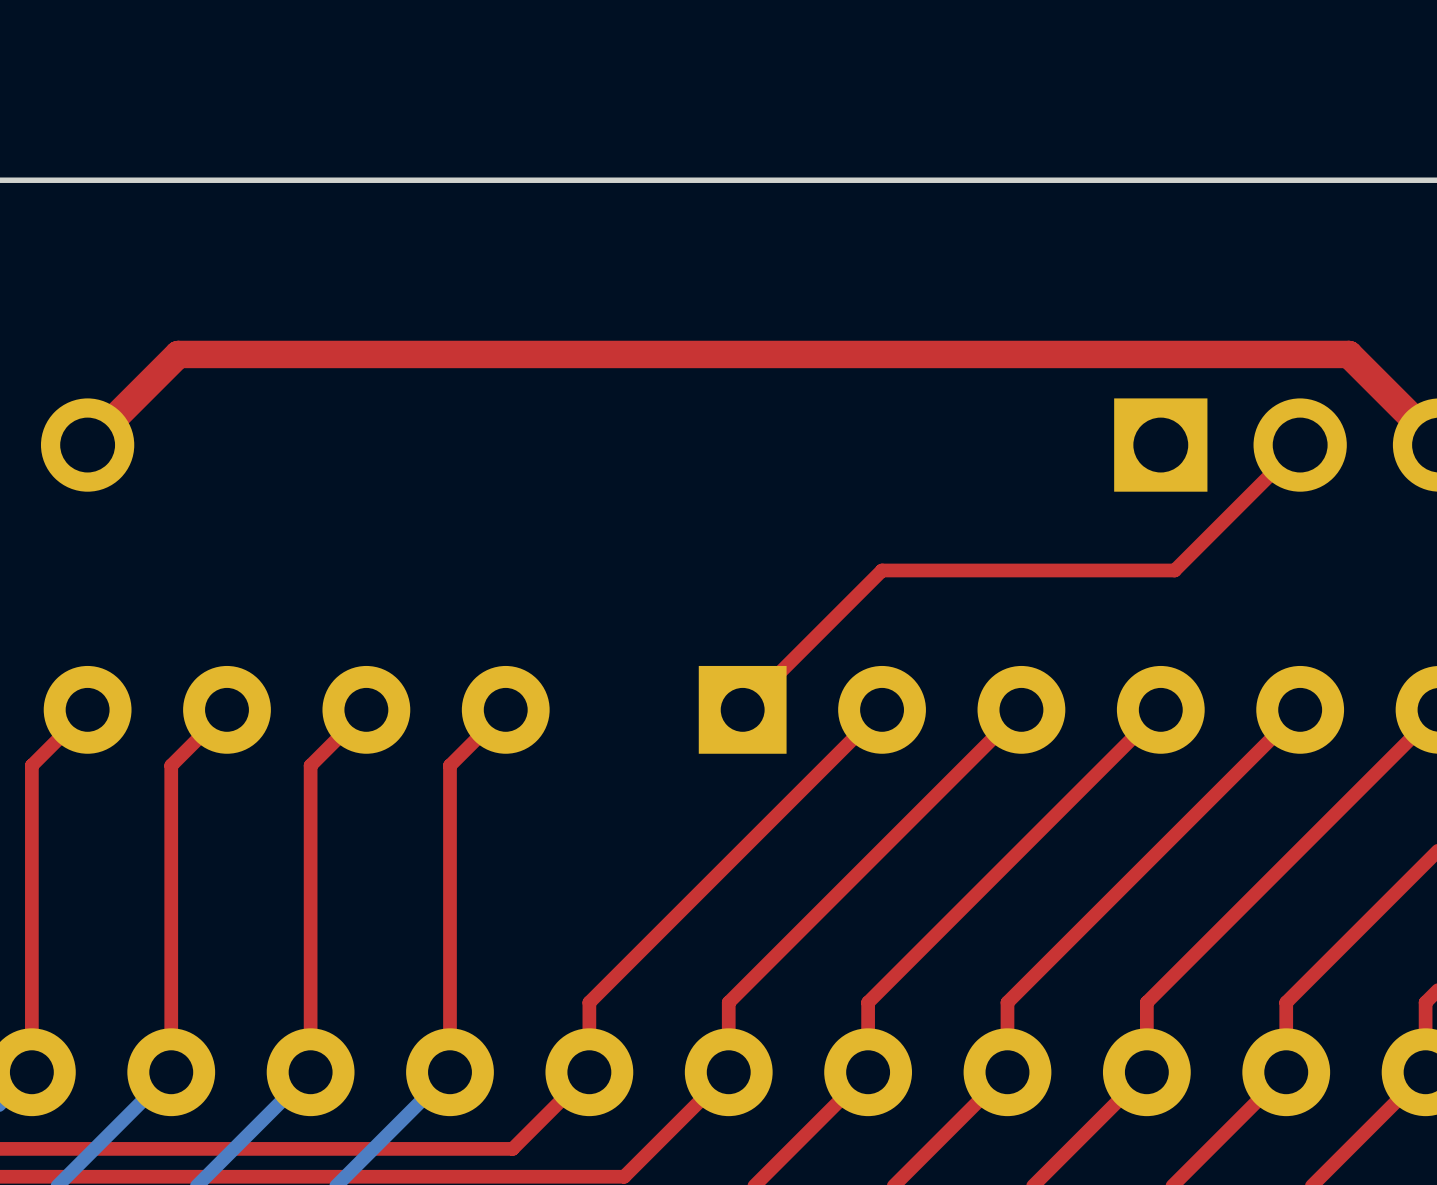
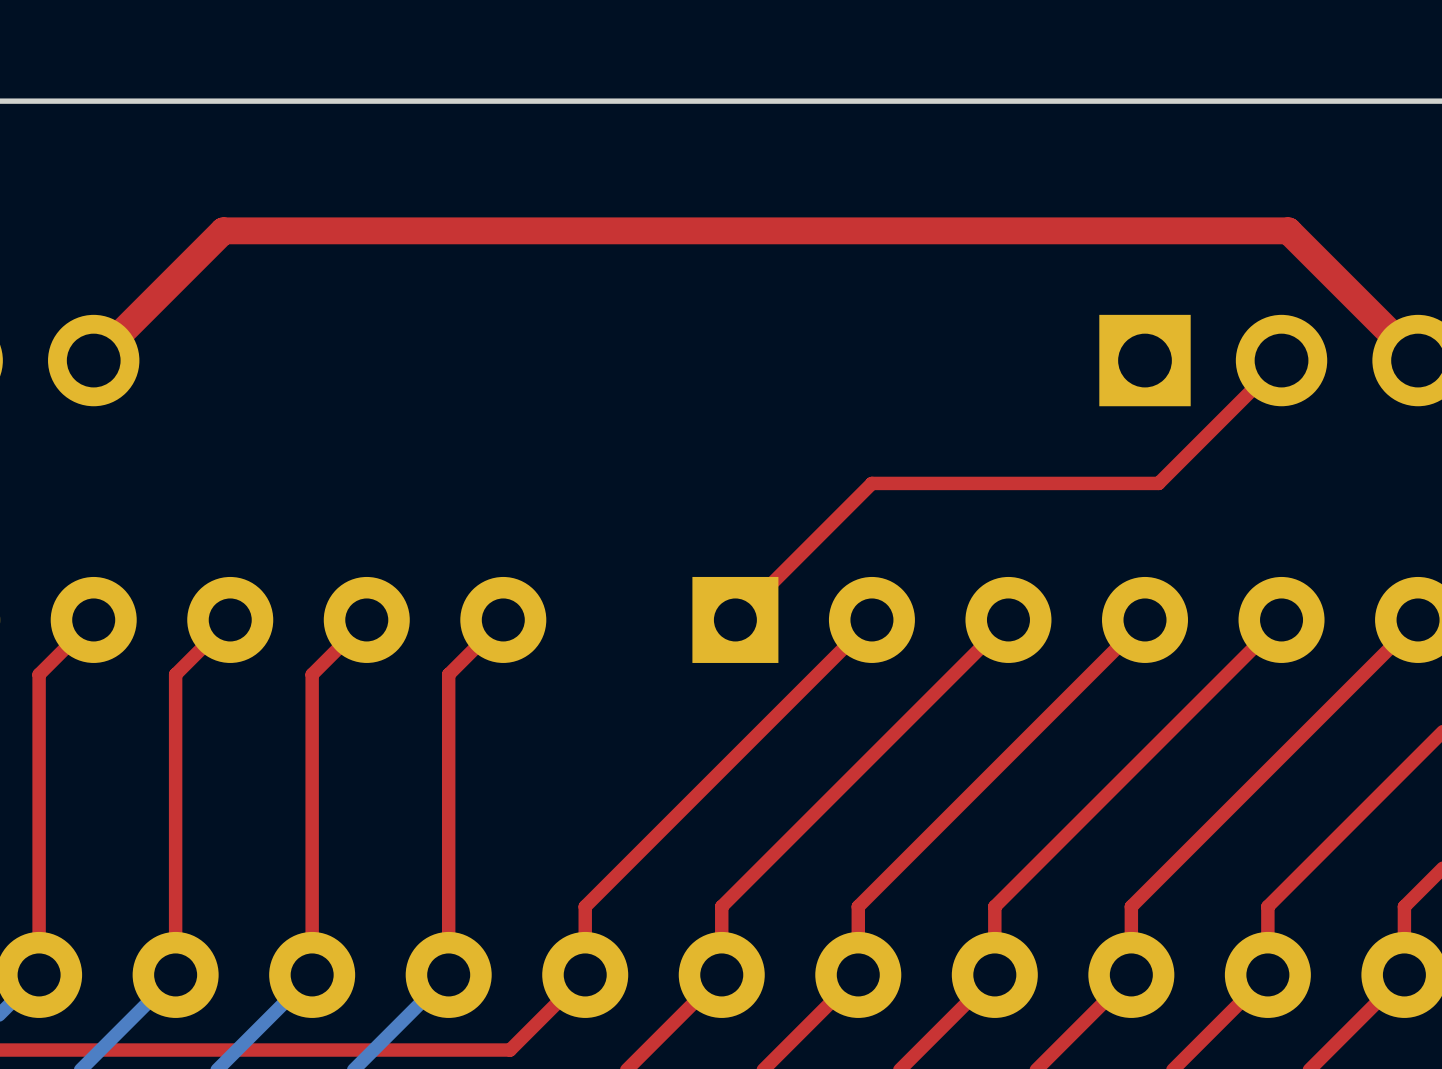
top track: (1348, 354) (178, 354) -> (1329, 271) (1288, 230) (223, 230) (182, 271)

